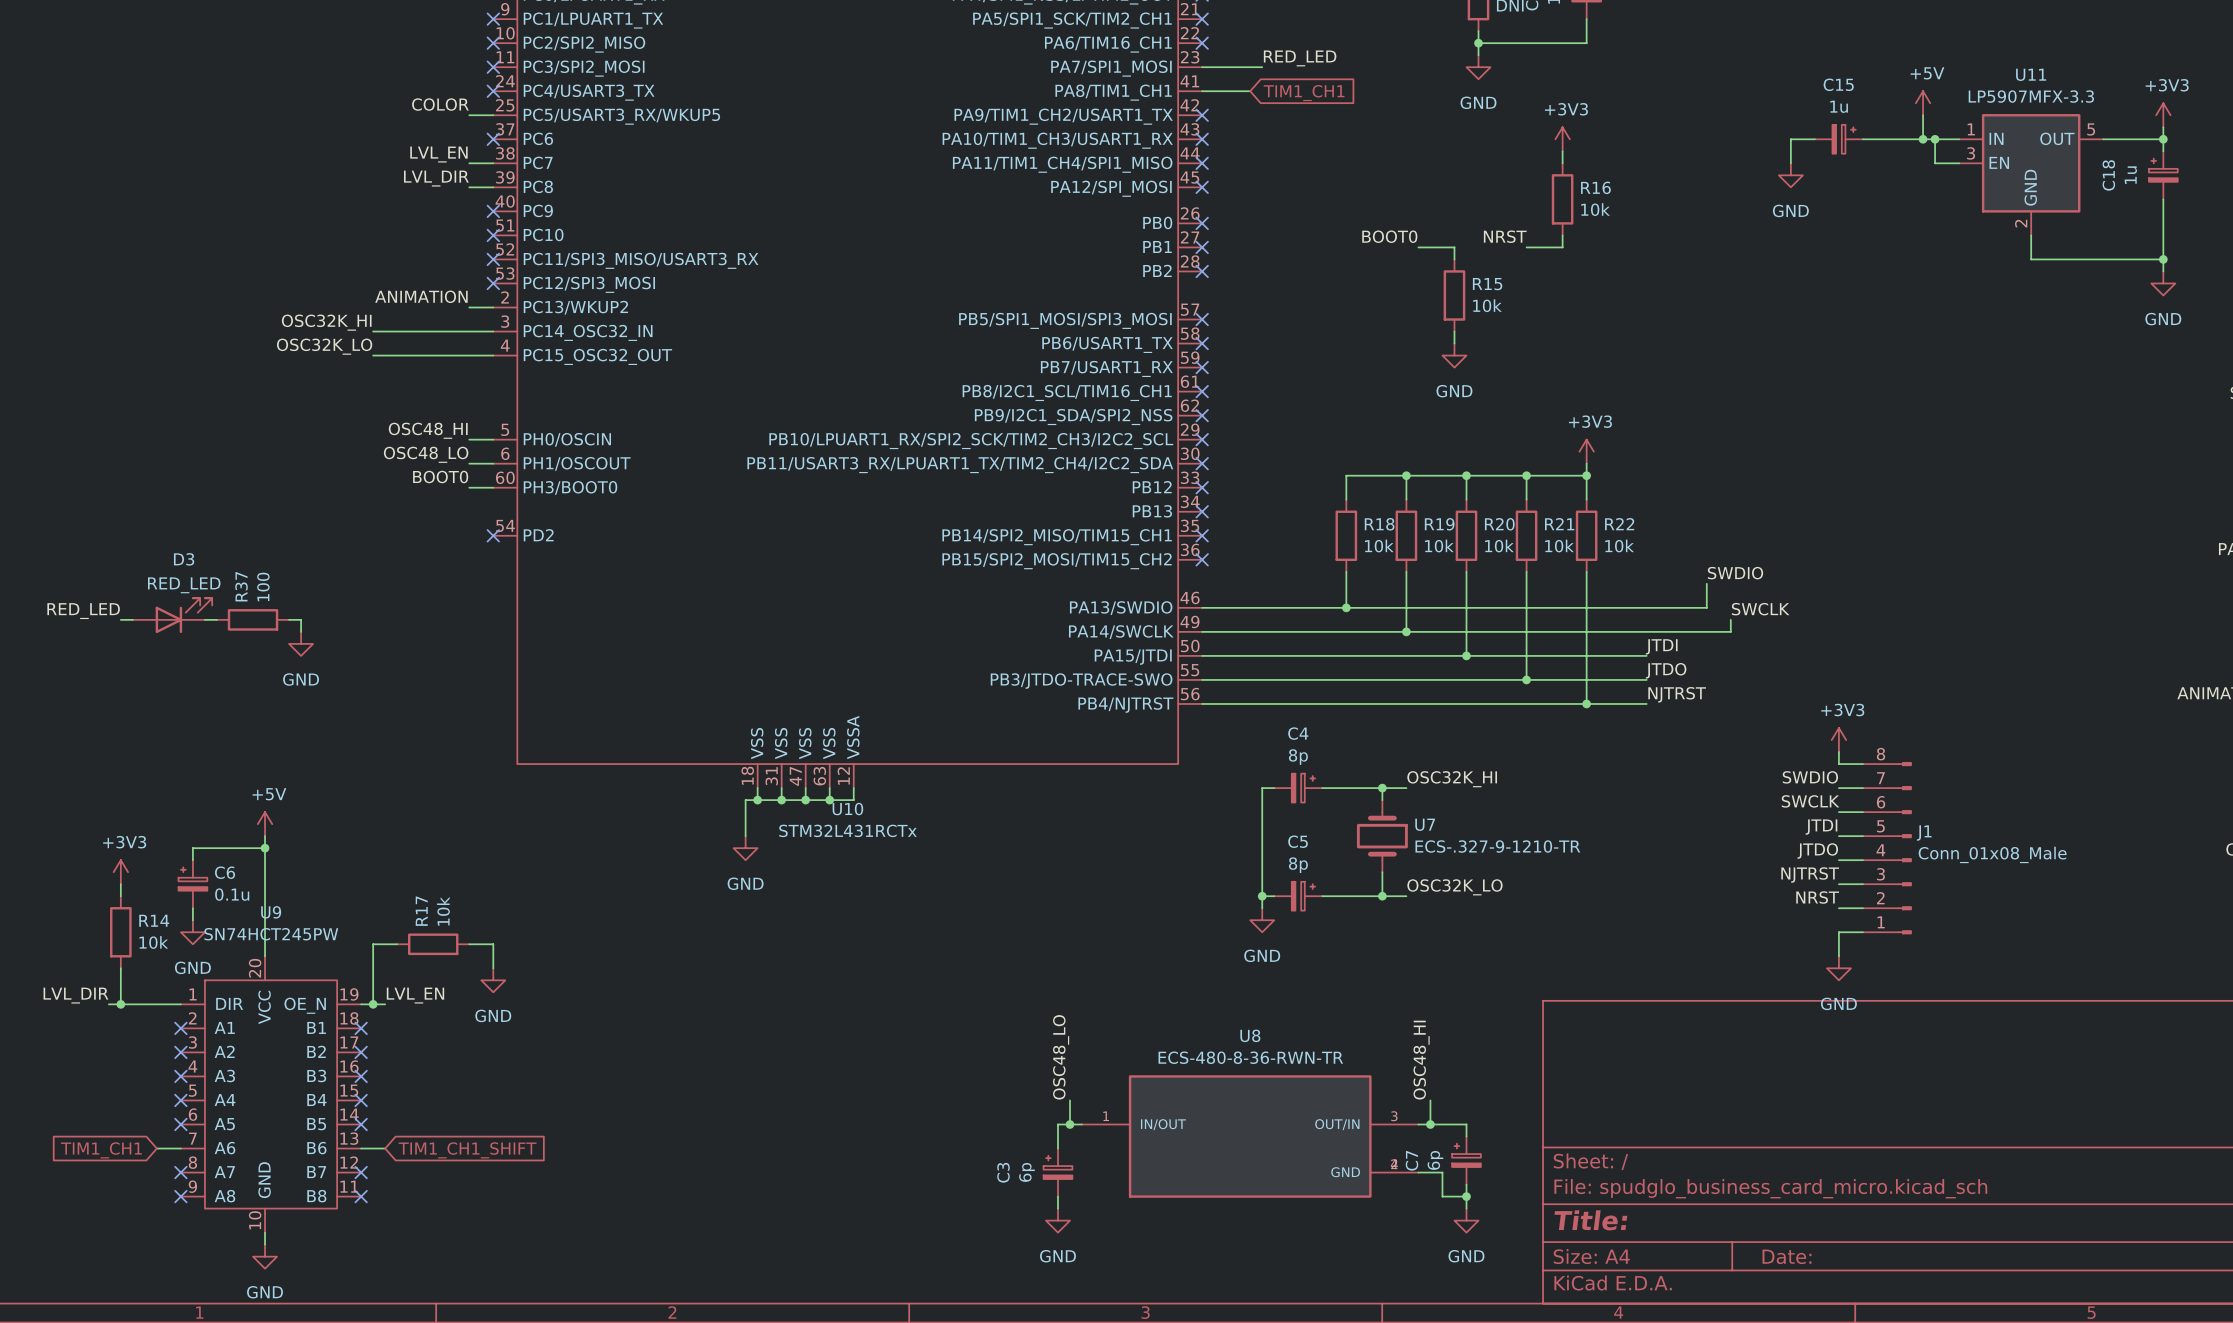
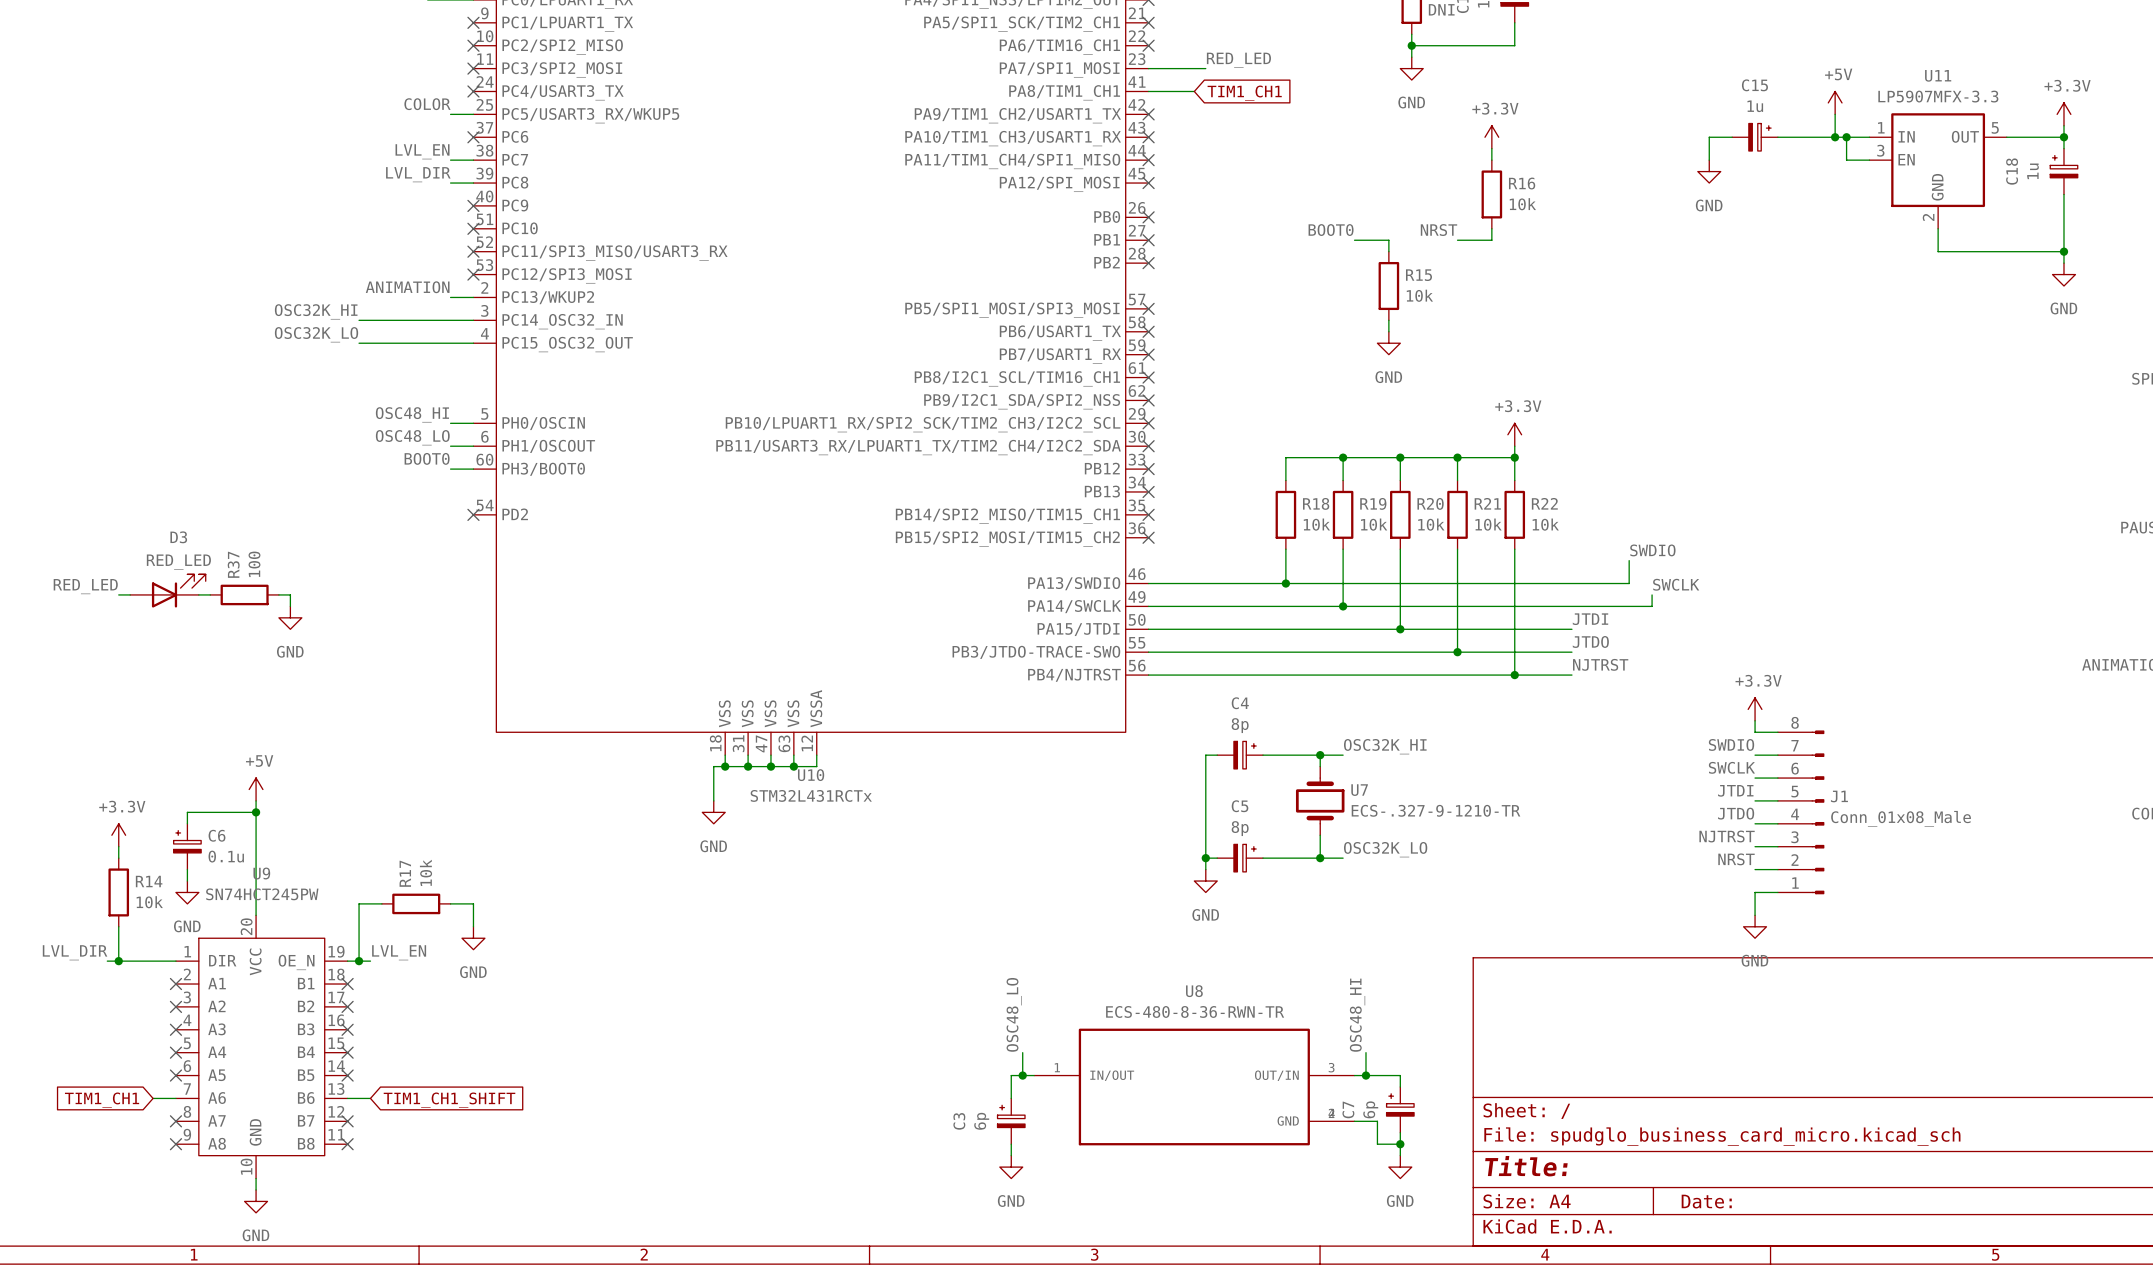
power symbol: +3V3 (2163, 115) -> +3.3V (2063, 114)
power symbol: +3V3 (1562, 139) -> +3.3V (1491, 137)
power symbol: +3V3 (1586, 451) -> +3.3V (1514, 434)
power symbol: +3V3 (1838, 740) -> +3.3V (1755, 709)
power symbol: +3V3 (120, 872) -> +3.3V (118, 835)

